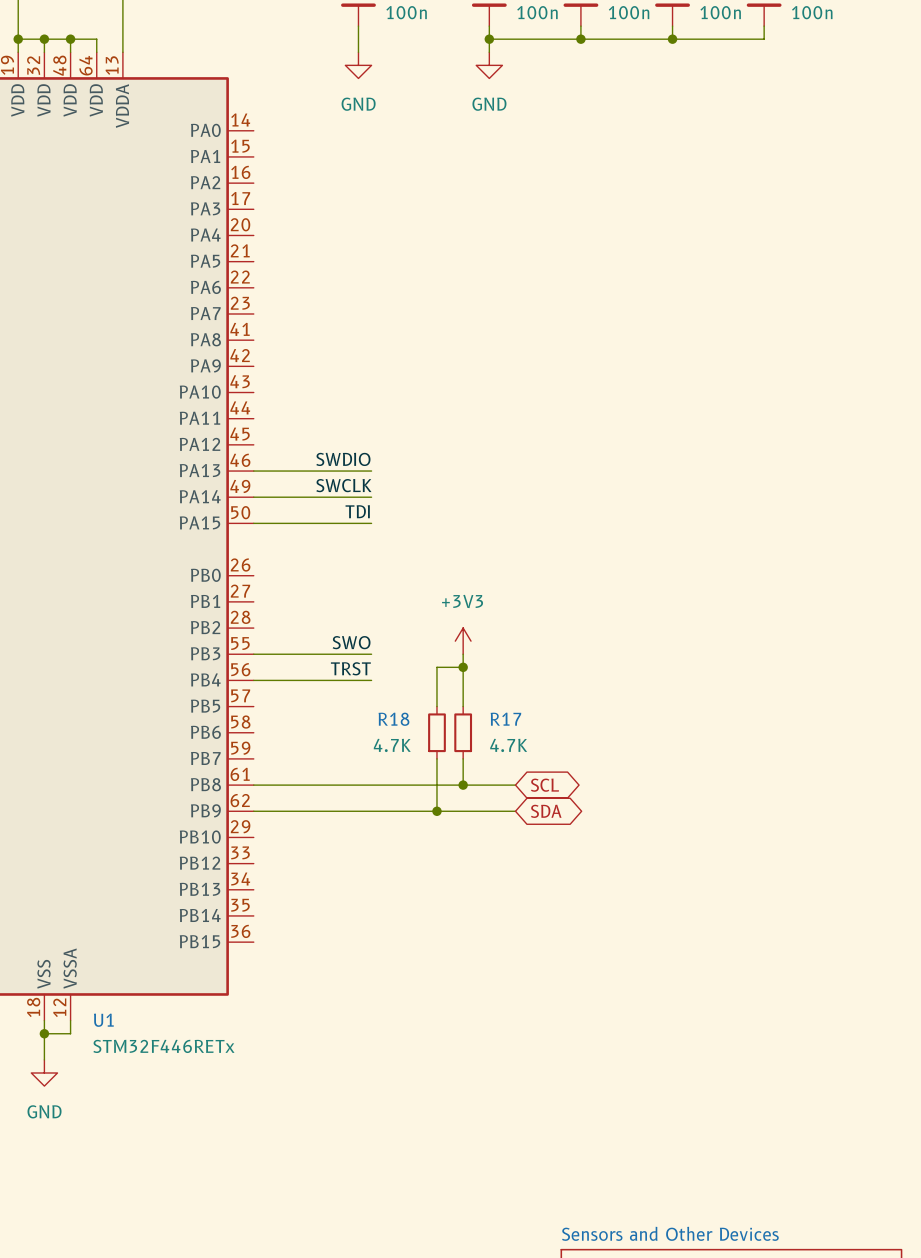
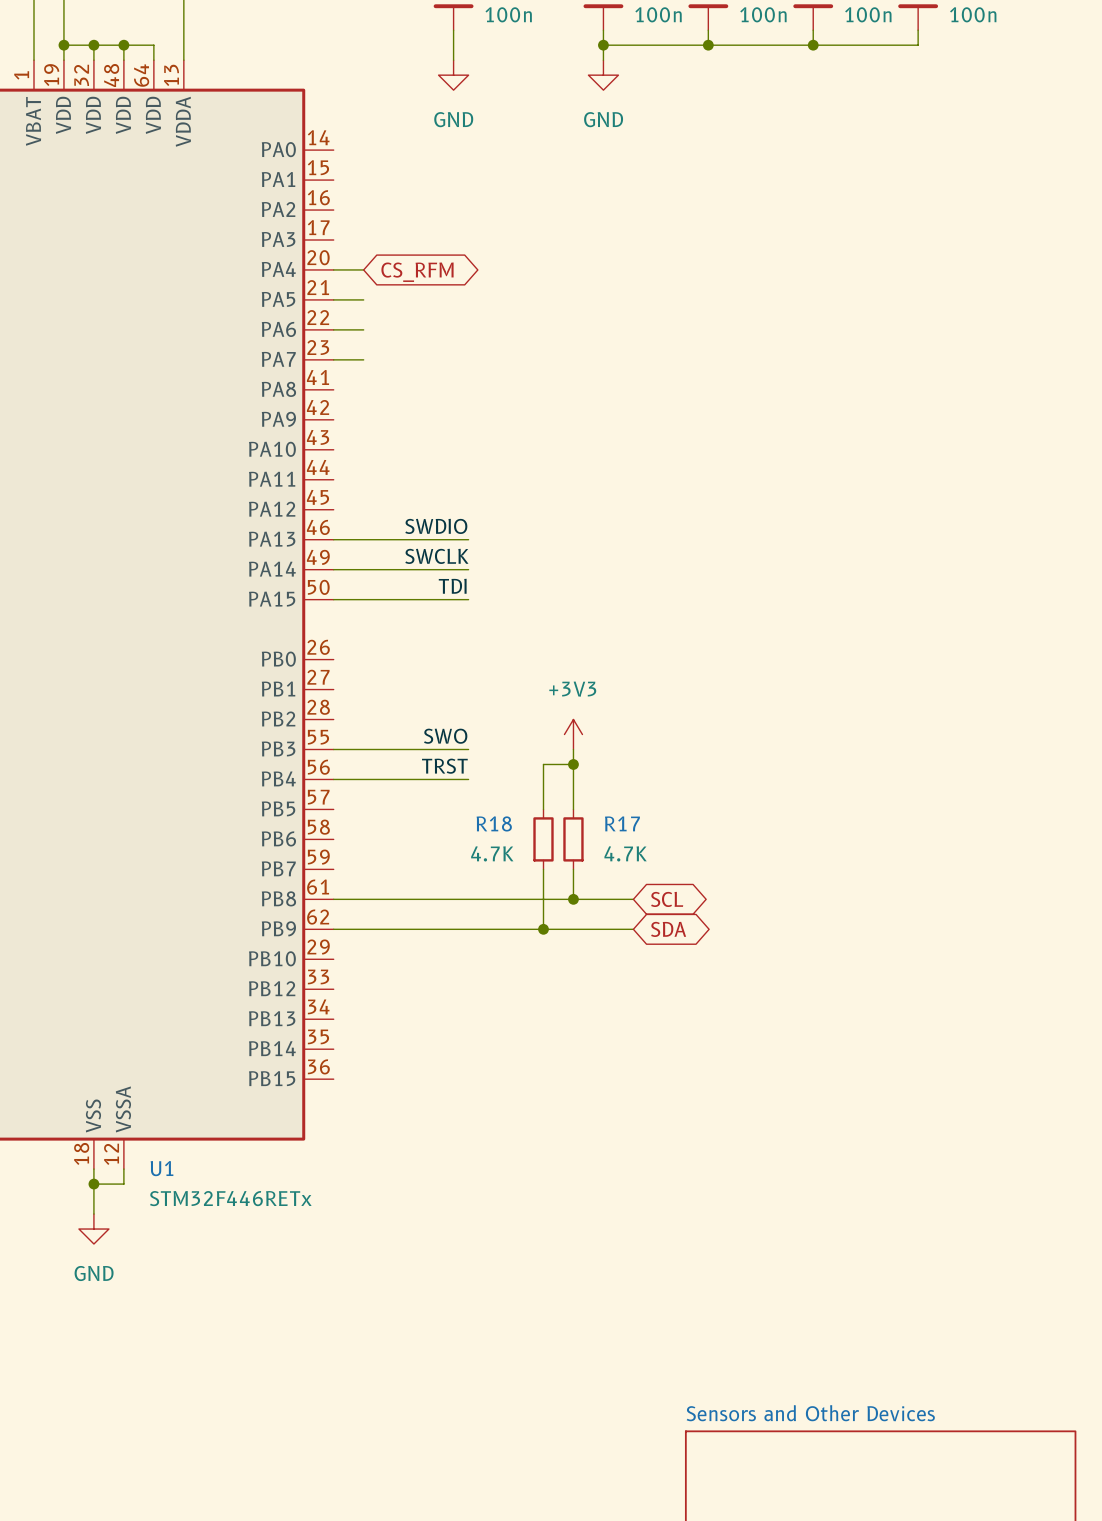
wire: none -> (333, 269) (363, 269)
global label: none -> CS_RFM (417, 272)
wire: none -> (333, 299) (363, 299)
wire: none -> (333, 329) (363, 329)
wire: none -> (333, 359) (363, 359)

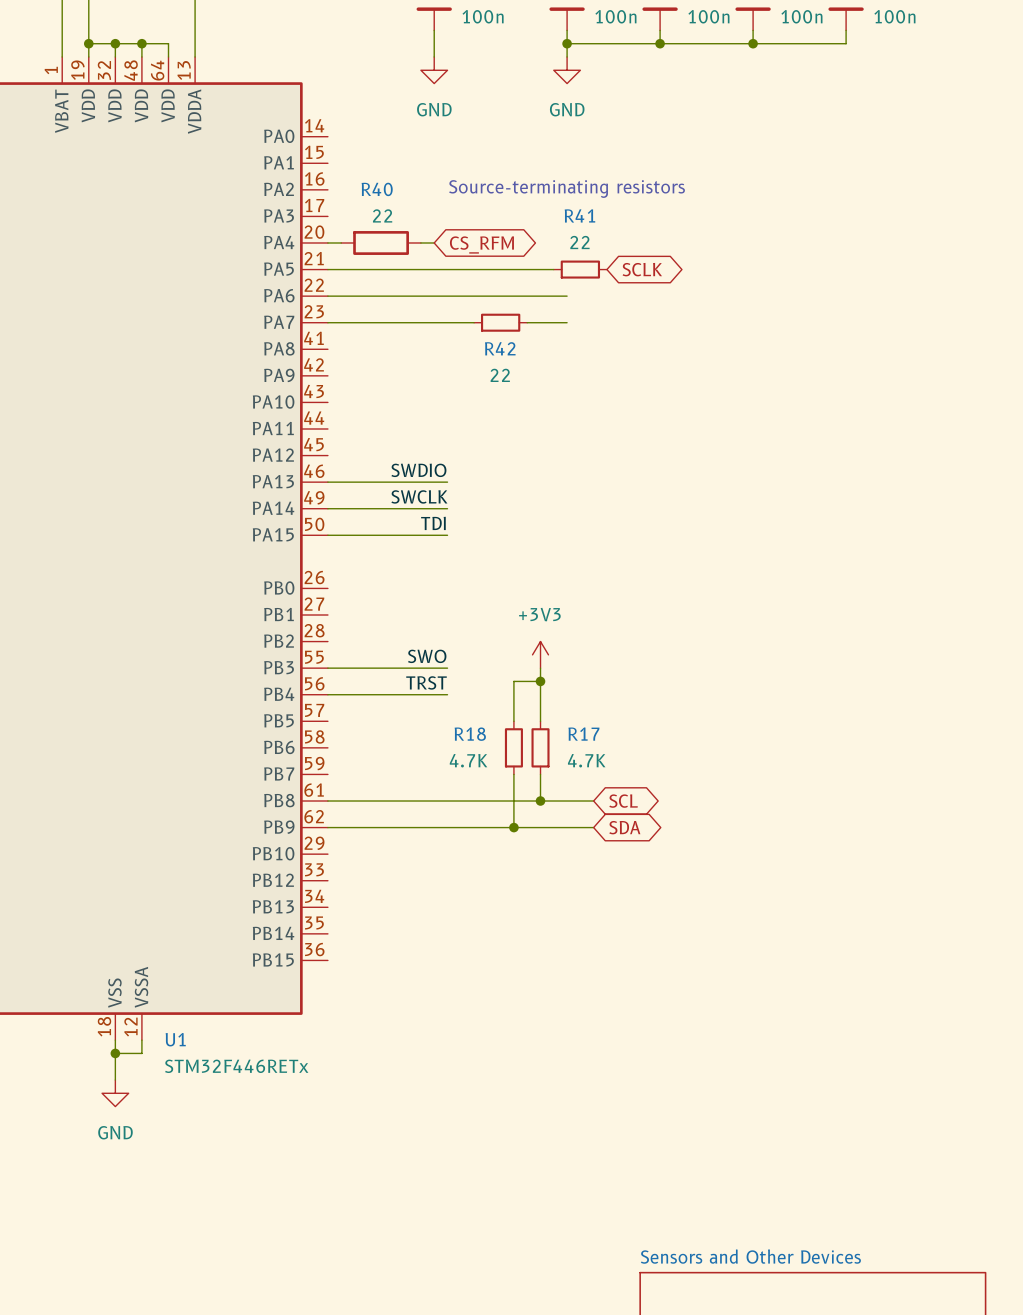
text: none -> Source-terminating resistors (567, 189)
R40: none -> 22 (381, 242)
global label position: CS_RFM (417, 272) -> CS_RFM (481, 244)
wire: none -> (354, 269) (553, 269)
R41: none -> 22 (580, 269)
global label: none -> SCLK (642, 269)
wire: none -> (354, 296) (567, 296)
wire: none -> (354, 322) (474, 322)
R42: none -> 22 (500, 322)
wire: none -> (527, 322) (567, 322)

